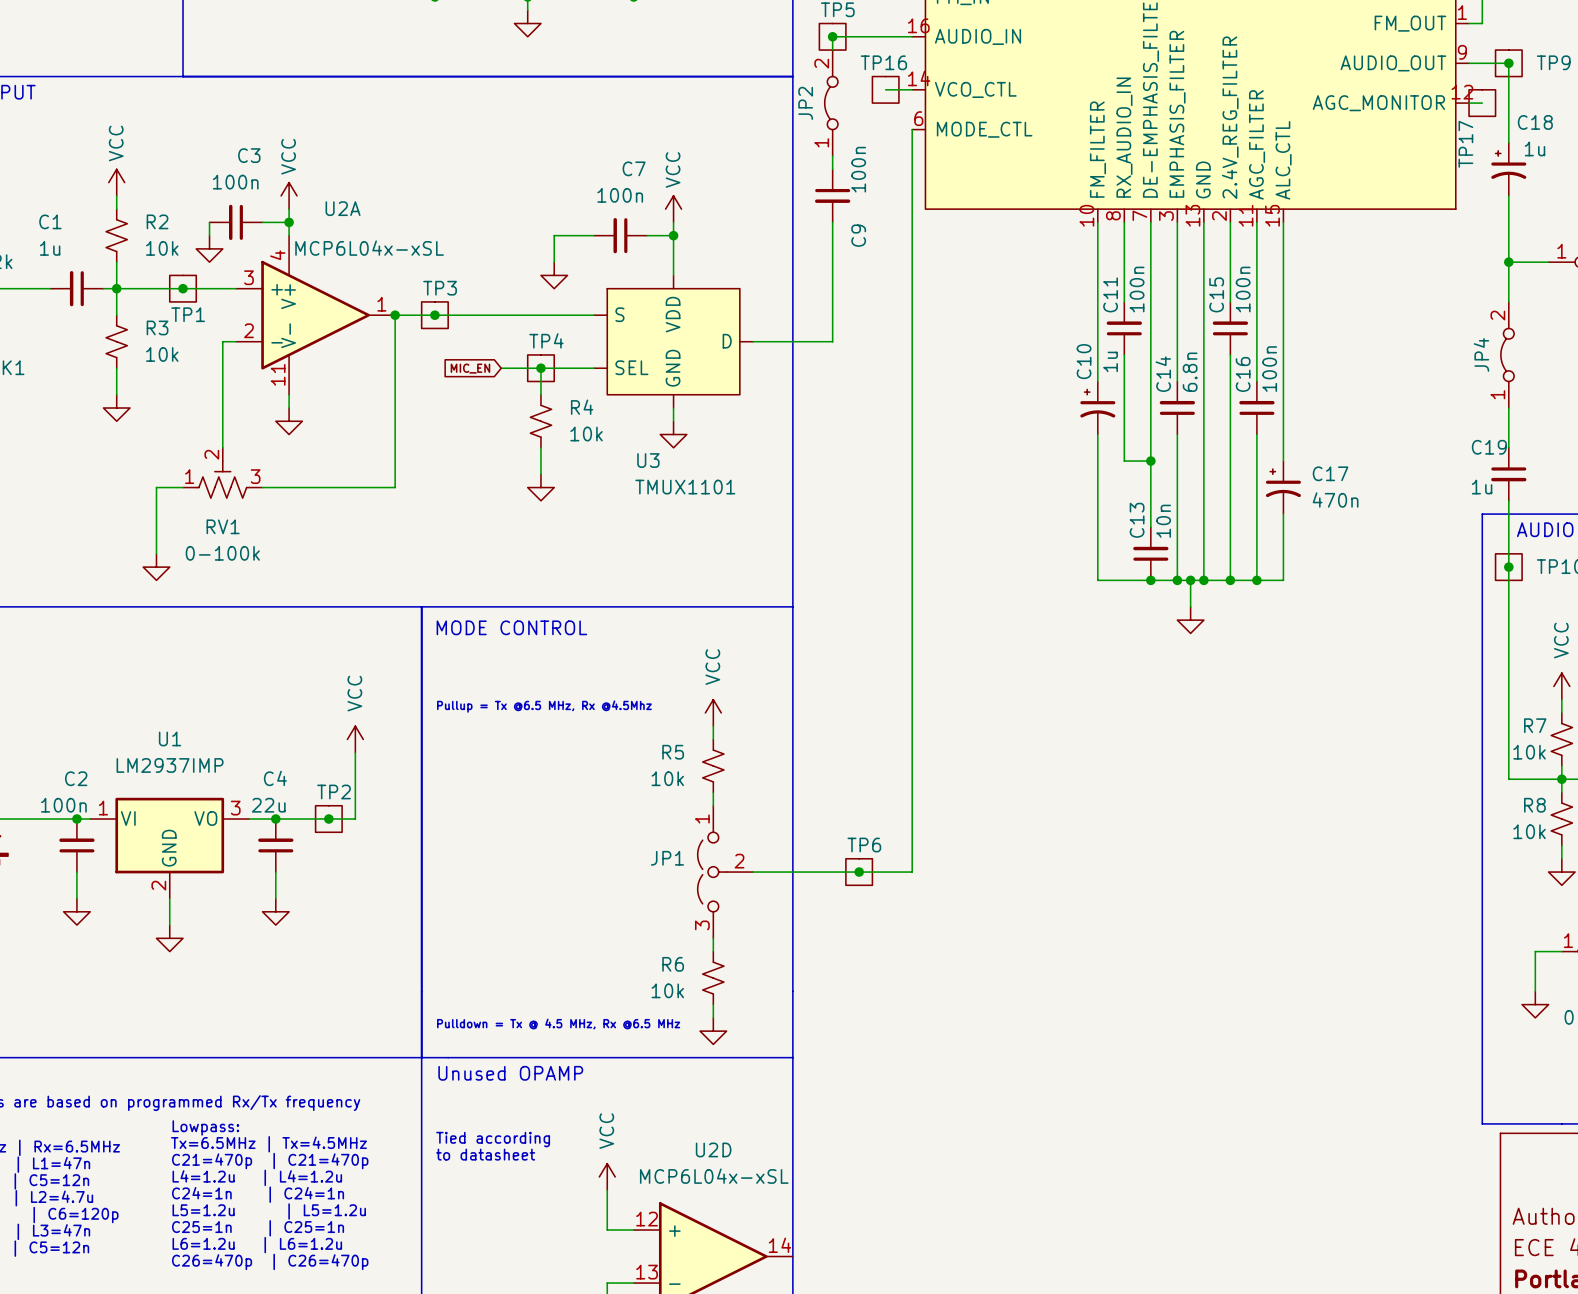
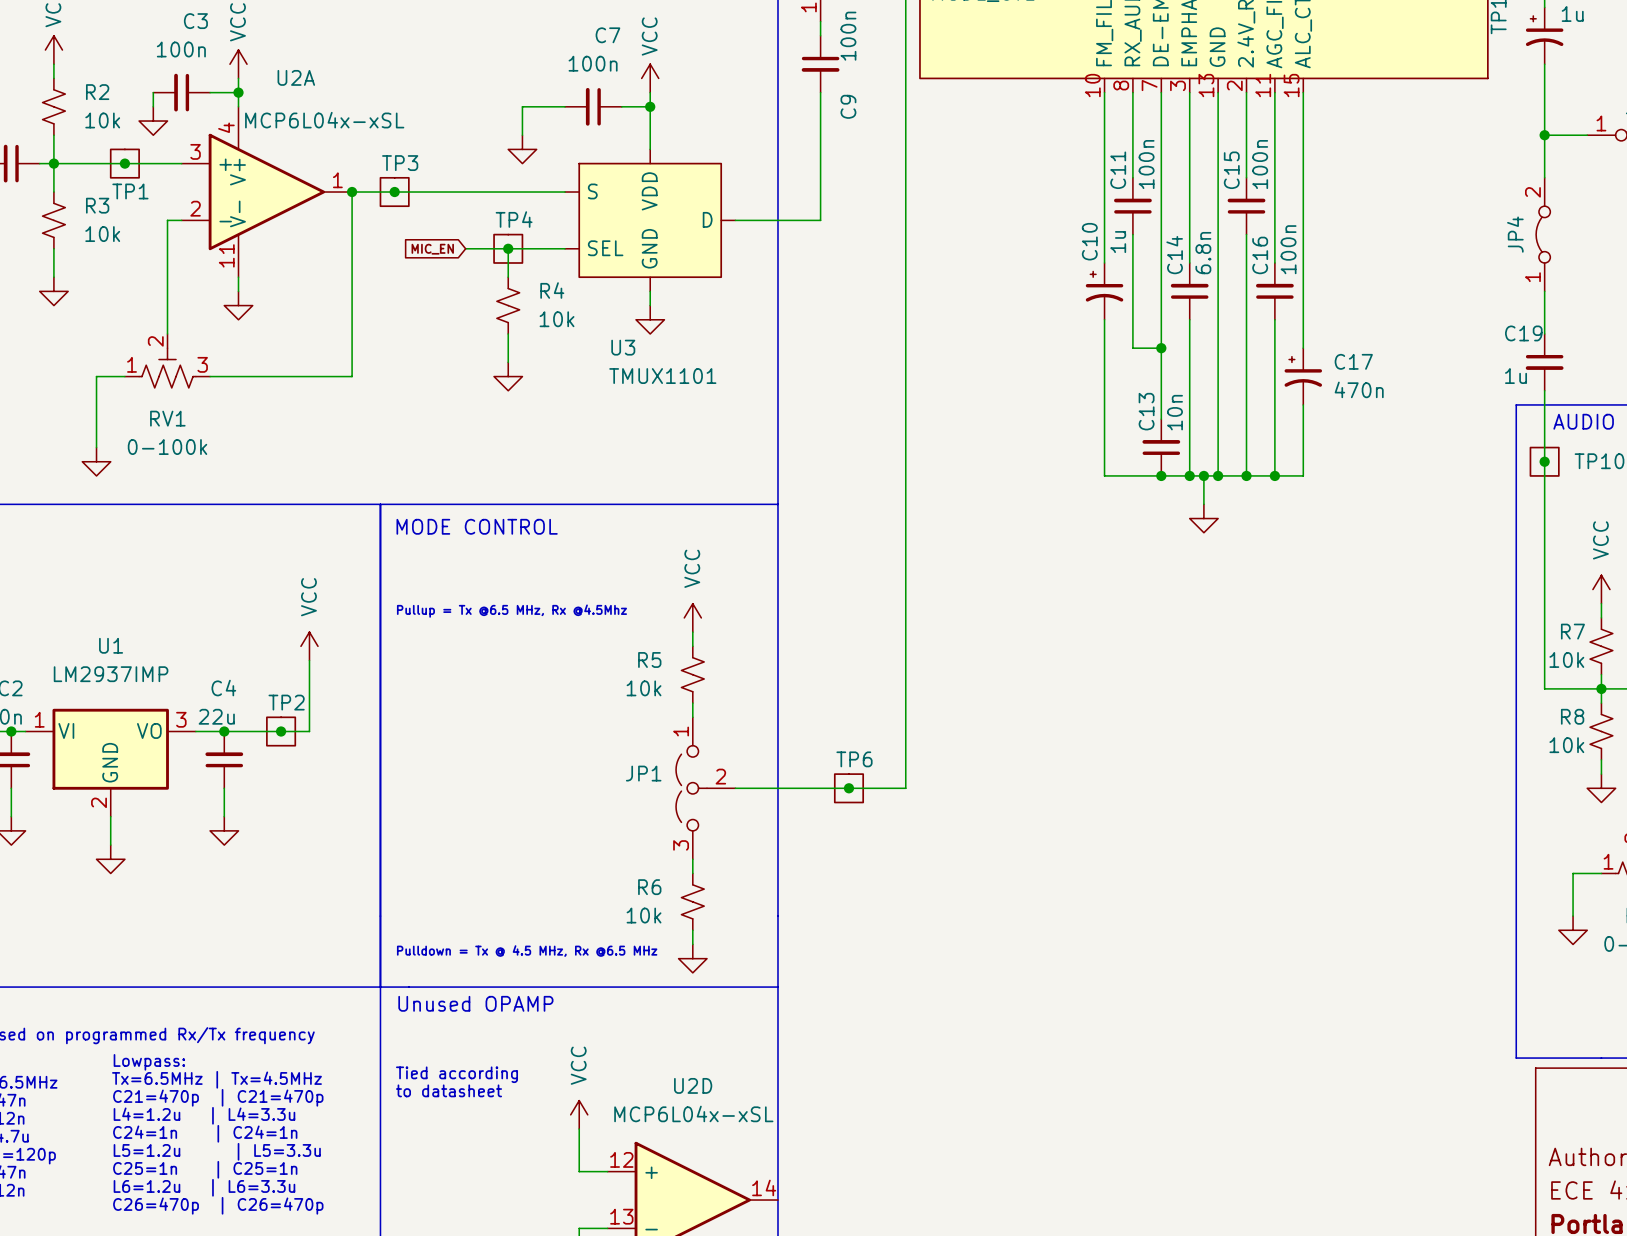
text: L4=1.2u | L4=1.2u (257, 1177) -> L4=1.2u | L4=3.3u (204, 1115)
text: L5=1.2u | L5=1.2u (269, 1211) -> L5=1.2u | L5=3.3u (217, 1151)
text: L6=1.2u | L6=1.2u (257, 1245) -> L6=1.2u | L6=3.3u (204, 1187)

